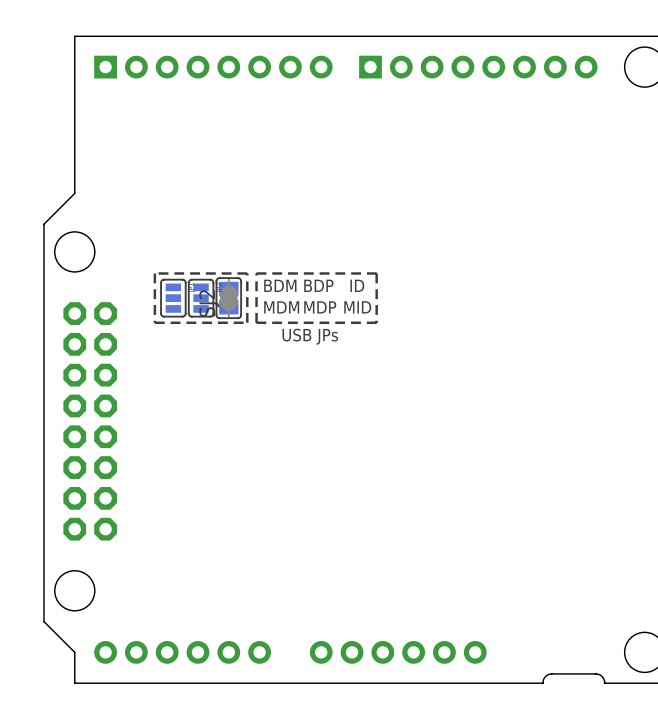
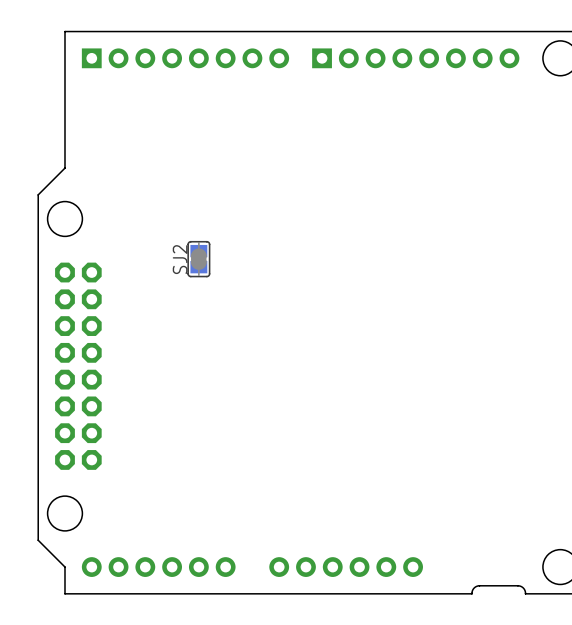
line: (247, 273) (154, 273) (154, 322) (247, 322) (247, 273) -> none
line: (376, 273) (256, 273) (256, 322) (376, 322) (376, 273) -> none
text: BDM (280, 285) -> none
text: BDP (318, 285) -> none
text: ID (357, 285) -> none
part: (173, 298) -> none
part: (201, 298) -> none
text: MDM (281, 307) -> none
text: MDP (320, 307) -> none
text: MID (357, 307) -> none
text: USB JPs (310, 336) -> none

